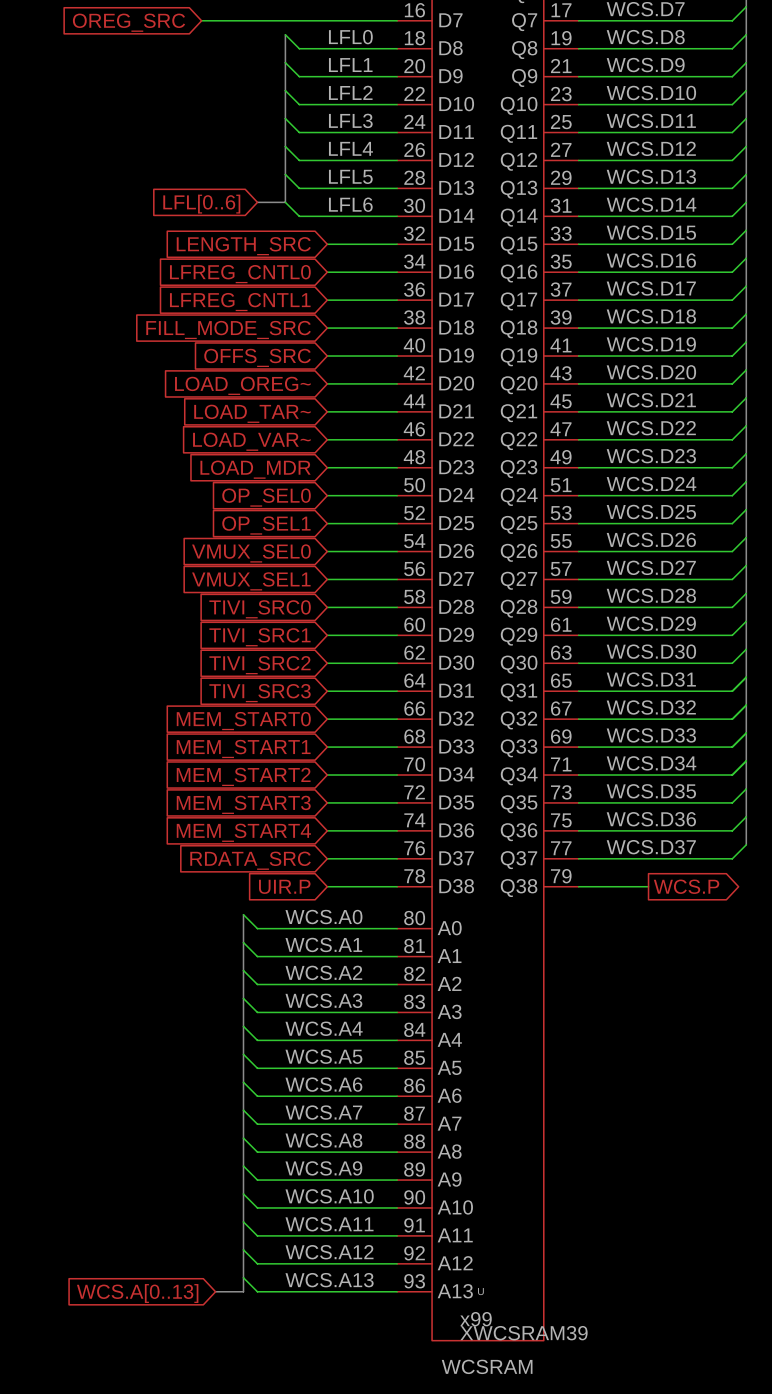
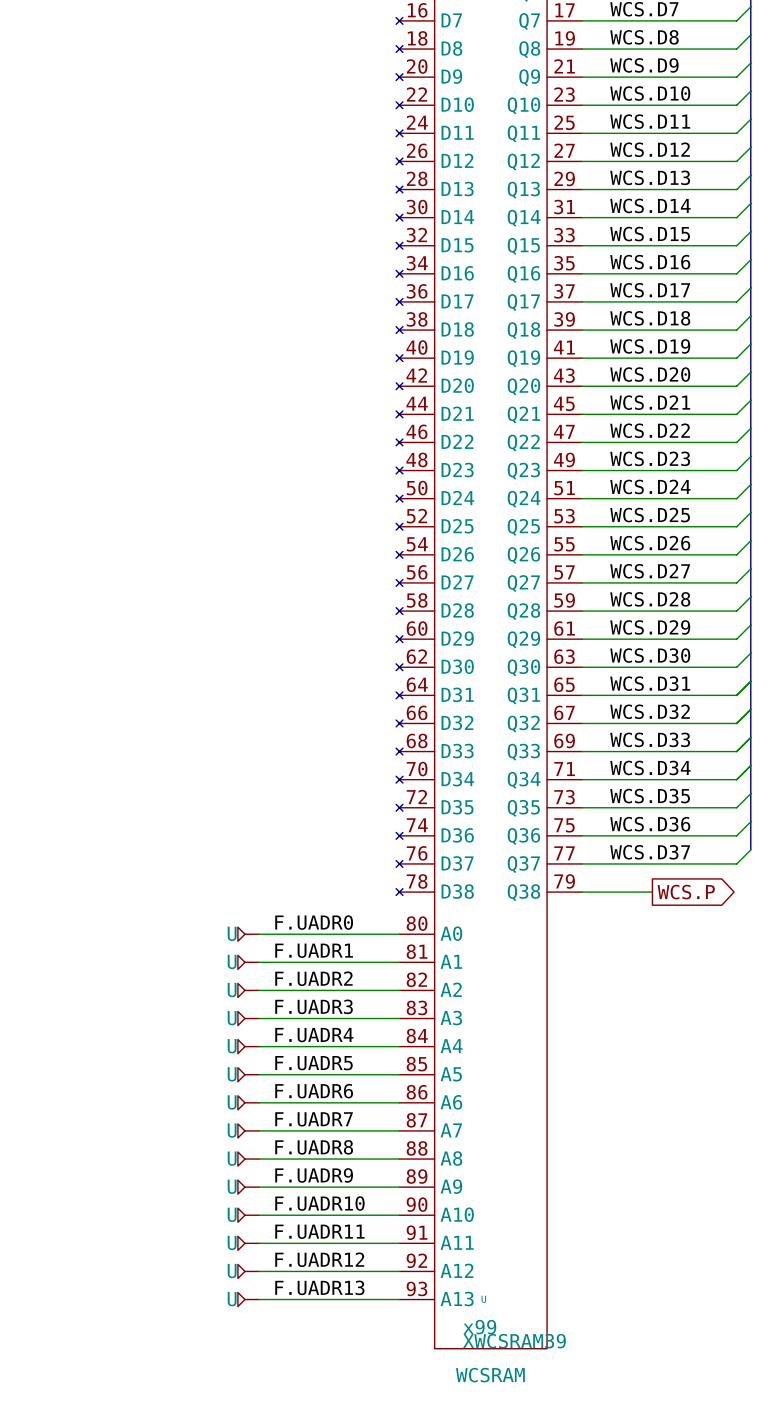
wire: (201, 20) (397, 20) -> none
no-connect mark: none -> (399, 20)
global label: OREG_SRC (129, 22) -> none
wire: (285, 34) (299, 48) (397, 48) -> none
bus: (285, 34) (285, 202) (257, 202) -> none
label: LFL0 (350, 37) -> none
no-connect mark: none -> (399, 49)
wire: (285, 62) (299, 76) (397, 76) -> none
label: LFL1 (350, 65) -> none
no-connect mark: none -> (399, 77)
wire: (285, 90) (299, 104) (397, 104) -> none
label: LFL2 (350, 92) -> none
no-connect mark: none -> (399, 105)
wire: (285, 118) (299, 132) (397, 132) -> none
label: LFL3 (350, 120) -> none
no-connect mark: none -> (399, 133)
wire: (285, 146) (299, 160) (397, 160) -> none
label: LFL4 (350, 148) -> none
no-connect mark: none -> (399, 161)
wire: (285, 174) (299, 188) (397, 188) -> none
label: LFL5 (350, 176) -> none
no-connect mark: none -> (399, 189)
wire: (285, 202) (299, 216) (397, 216) -> none
global label: LFL[0..6] (201, 204) -> none
label: LFL6 (350, 204) -> none
no-connect mark: none -> (399, 217)
wire: (327, 244) (397, 244) -> none
no-connect mark: none -> (399, 245)
global label: LENGTH_SRC (243, 246) -> none
wire: (327, 272) (397, 272) -> none
no-connect mark: none -> (399, 273)
global label: LFREG_CNTL0 (240, 274) -> none
wire: (327, 300) (397, 300) -> none
no-connect mark: none -> (399, 301)
global label: LFREG_CNTL1 (240, 302) -> none
wire: (327, 328) (397, 328) -> none
no-connect mark: none -> (399, 330)
global label: FILL_MODE_SRC (228, 329) -> none
wire: (327, 356) (397, 356) -> none
no-connect mark: none -> (399, 358)
global label: OFFS_SRC (257, 357) -> none
wire: (327, 383) (397, 383) -> none
no-connect mark: none -> (399, 386)
global label: LOAD_OREG~ (242, 385) -> none
wire: (327, 411) (397, 411) -> none
no-connect mark: none -> (399, 414)
global label: LOAD_TAR~ (252, 413) -> none
wire: (327, 439) (397, 439) -> none
no-connect mark: none -> (399, 442)
global label: LOAD_VAR~ (251, 441) -> none
wire: (327, 467) (397, 467) -> none
no-connect mark: none -> (399, 470)
global label: LOAD_MDR (255, 469) -> none
wire: (327, 495) (397, 495) -> none
no-connect mark: none -> (399, 498)
global label: OP_SEL0 (266, 497) -> none
wire: (327, 523) (397, 523) -> none
no-connect mark: none -> (399, 526)
global label: OP_SEL1 (266, 525) -> none
wire: (327, 551) (397, 551) -> none
no-connect mark: none -> (399, 554)
global label: VMUX_SEL0 (251, 553) -> none
wire: (327, 579) (397, 579) -> none
no-connect mark: none -> (399, 582)
global label: VMUX_SEL1 (251, 581) -> none
wire: (327, 607) (397, 607) -> none
no-connect mark: none -> (399, 611)
global label: TIVI_SRC0 (260, 609) -> none
wire: (327, 635) (397, 635) -> none
no-connect mark: none -> (399, 639)
global label: TIVI_SRC1 (259, 637) -> none
wire: (327, 663) (397, 663) -> none
no-connect mark: none -> (399, 667)
global label: TIVI_SRC2 (259, 665) -> none
wire: (327, 691) (397, 691) -> none
no-connect mark: none -> (399, 695)
global label: TIVI_SRC3 (260, 693) -> none
wire: (327, 719) (397, 719) -> none
no-connect mark: none -> (399, 723)
global label: MEM_START0 (243, 721) -> none
wire: (327, 747) (397, 747) -> none
no-connect mark: none -> (399, 751)
global label: MEM_START1 (243, 748) -> none
wire: (327, 775) (397, 775) -> none
no-connect mark: none -> (399, 779)
global label: MEM_START2 (243, 776) -> none
wire: (327, 802) (397, 802) -> none
no-connect mark: none -> (399, 807)
global label: MEM_START3 (243, 804) -> none
wire: (327, 830) (397, 830) -> none
no-connect mark: none -> (399, 835)
global label: MEM_START4 (243, 832) -> none
wire: (327, 858) (397, 858) -> none
no-connect mark: none -> (399, 863)
global label: RDATA_SRC (250, 860) -> none
global label: UIR.P (284, 886) -> none
wire: (327, 886) (397, 886) -> none
no-connect mark: none -> (399, 892)
wire: (243, 914) (257, 928) -> none
bus: (243, 914) (243, 1291) (215, 1291) -> none
label: none -> F.UADR0 (314, 922)
label: WCS.A0 (323, 917) -> none
U: none -> (248, 934)
wire: (243, 942) (257, 956) -> none
label: WCS.A1 (323, 944) -> none
label: none -> F.UADR1 (314, 950)
U: none -> (248, 962)
wire: (243, 970) (257, 984) -> none
label: none -> F.UADR2 (313, 978)
label: WCS.A2 (323, 972) -> none
U: none -> (248, 990)
wire: (243, 998) (257, 1012) -> none
label: none -> F.UADR3 (314, 1006)
label: WCS.A3 (323, 1000) -> none
U: none -> (248, 1018)
wire: (243, 1026) (257, 1040) -> none
label: none -> F.UADR4 (314, 1035)
label: WCS.A4 (324, 1028) -> none
U: none -> (248, 1046)
wire: (243, 1054) (257, 1068) -> none
label: none -> F.UADR5 (313, 1063)
label: WCS.A5 (323, 1056) -> none
U: none -> (248, 1074)
wire: (243, 1082) (257, 1096) -> none
label: none -> F.UADR6 (314, 1091)
label: WCS.A6 (323, 1084) -> none
U: none -> (248, 1102)
wire: (243, 1110) (257, 1124) -> none
label: none -> F.UADR7 (314, 1119)
label: WCS.A7 (323, 1112) -> none
U: none -> (248, 1130)
wire: (243, 1138) (257, 1152) -> none
label: none -> F.UADR8 (314, 1147)
label: WCS.A8 (323, 1140) -> none
U: none -> (248, 1159)
wire: (243, 1166) (257, 1180) -> none
label: none -> F.UADR9 (314, 1175)
label: WCS.A9 (323, 1168) -> none
U: none -> (248, 1187)
wire: (243, 1194) (257, 1207) -> none
label: none -> F.UADR10 (319, 1203)
label: WCS.A10 (329, 1196) -> none
U: none -> (248, 1215)
wire: (243, 1221) (257, 1235) -> none
label: none -> F.UADR11 (319, 1231)
label: WCS.A11 (329, 1224) -> none
U: none -> (248, 1243)
wire: (243, 1249) (257, 1263) -> none
label: none -> F.UADR12 (319, 1259)
label: WCS.A12 (329, 1252) -> none
U: none -> (248, 1271)
wire: (243, 1277) (257, 1291) -> none
label: none -> F.UADR13 (319, 1287)
label: WCS.A13 (329, 1280) -> none
U: none -> (248, 1299)
global label: WCS.A[0..13] (137, 1293) -> none

